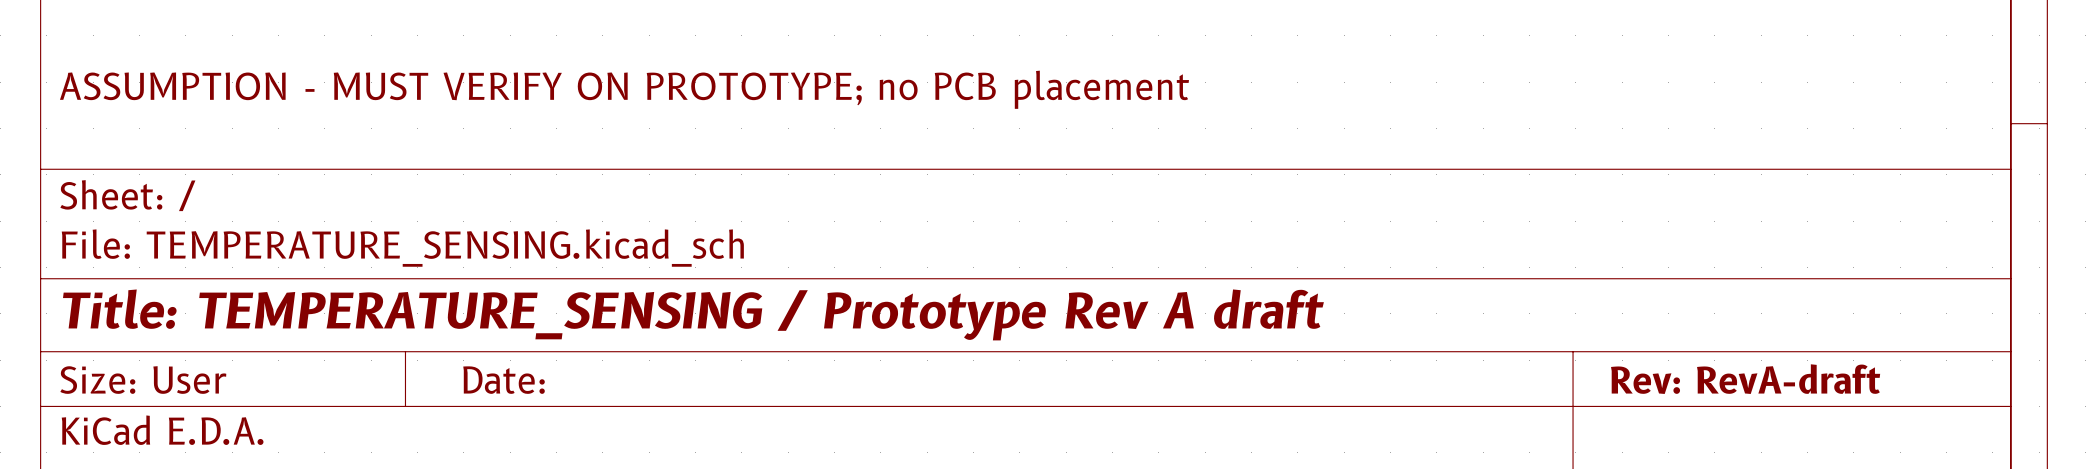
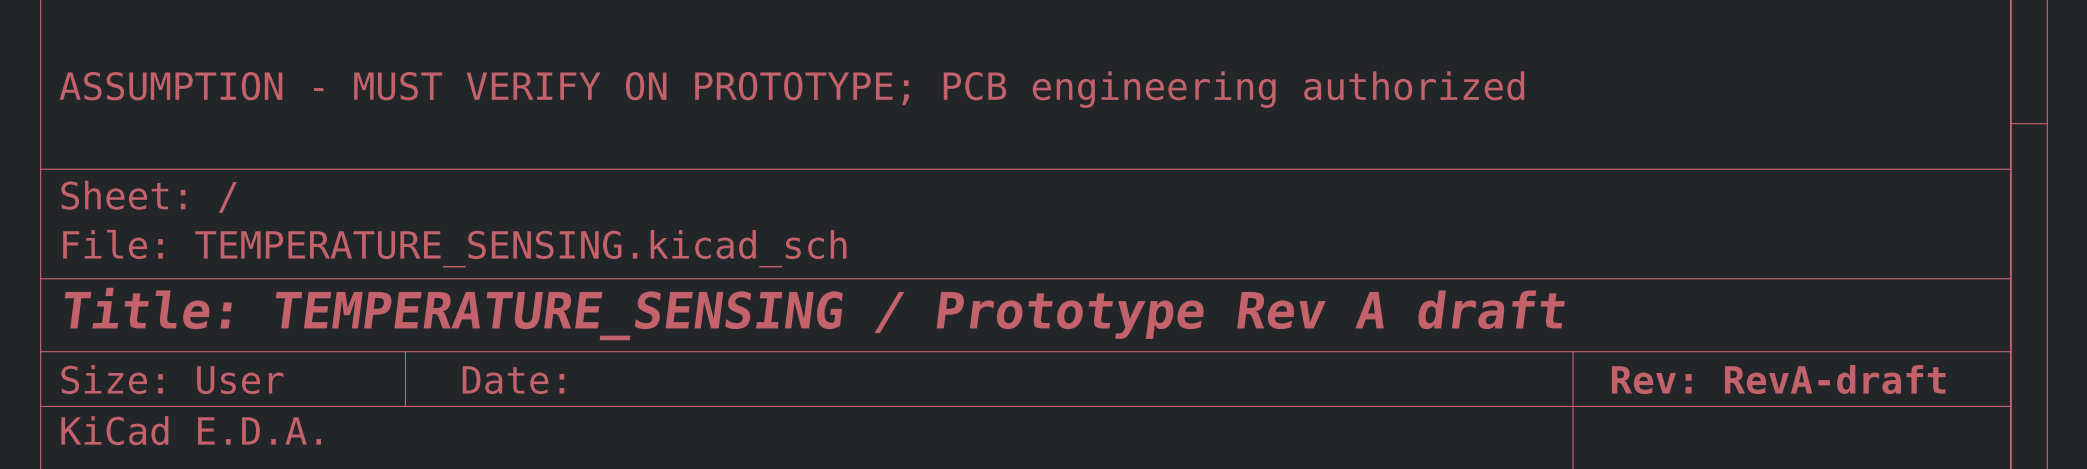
title block: ASSUMPTION - MUST VERIFY ON PROTOTYPE; no PCB placement (624, 89) -> ASSUMPTION - MUST VERIFY ON PROTOTYPE; PCB engineering authorized (791, 89)

